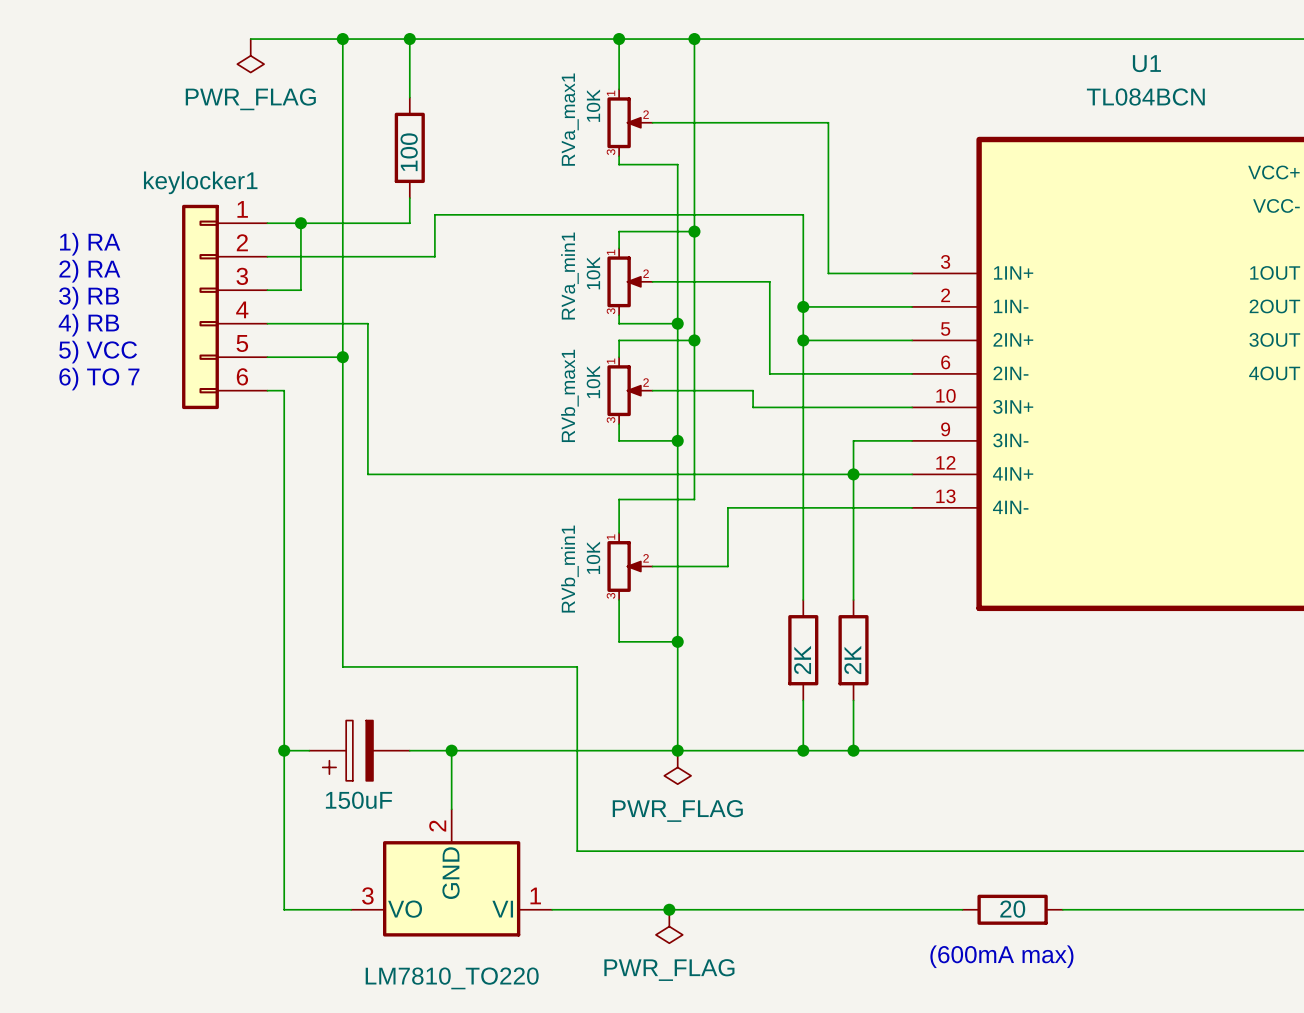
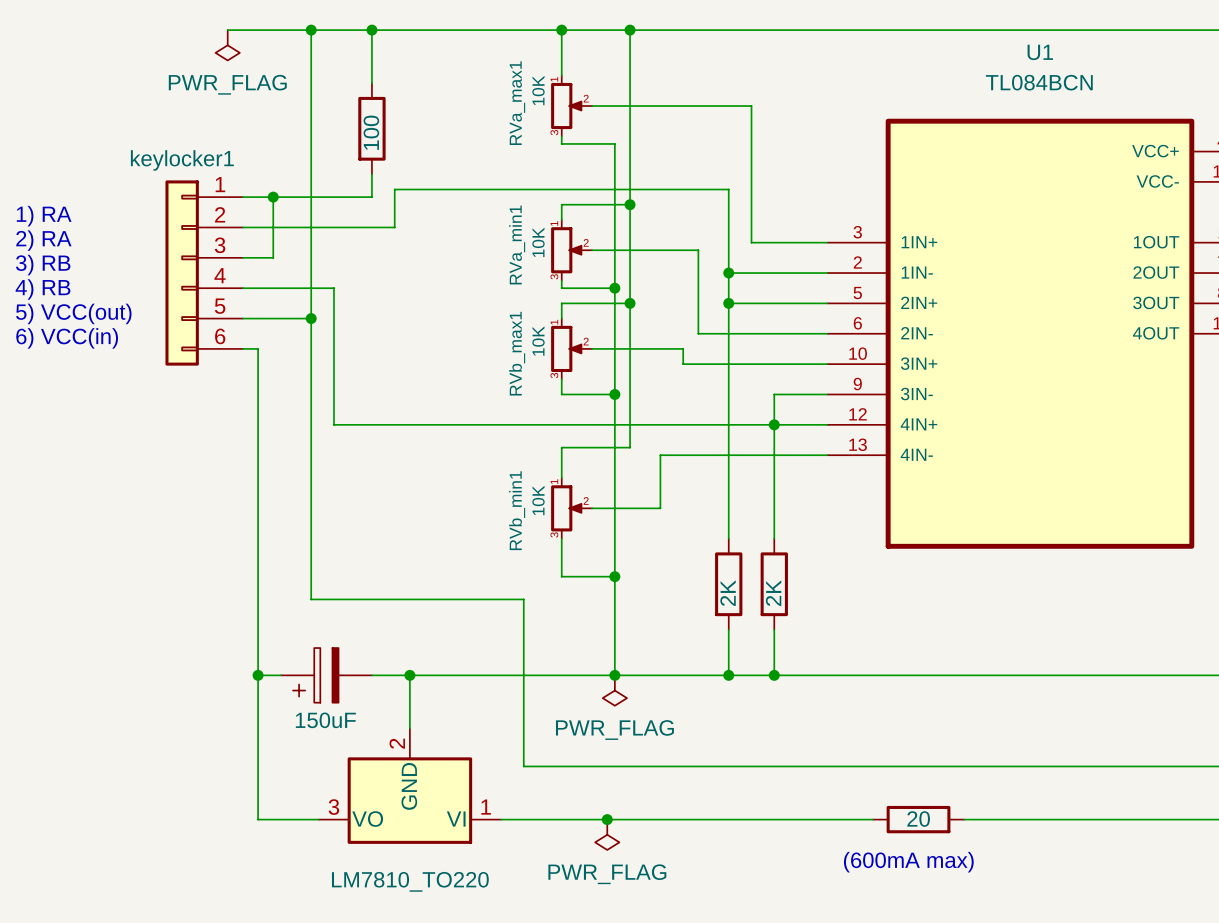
text position: 1) RA (90, 244) -> 1) RA (44, 216)
text position: 2) RA (89, 271) -> 2) RA (43, 240)
text position: 3) RB (89, 298) -> 3) RB (43, 265)
text position: 4) RB (88, 325) -> 4) RB (43, 289)
text: none -> 5) VCC(out) (73, 313)
text: 5) VCC (98, 352) -> none
text: none -> 6) VCC(in) (67, 338)
text: 6) TO 7 (99, 379) -> none

